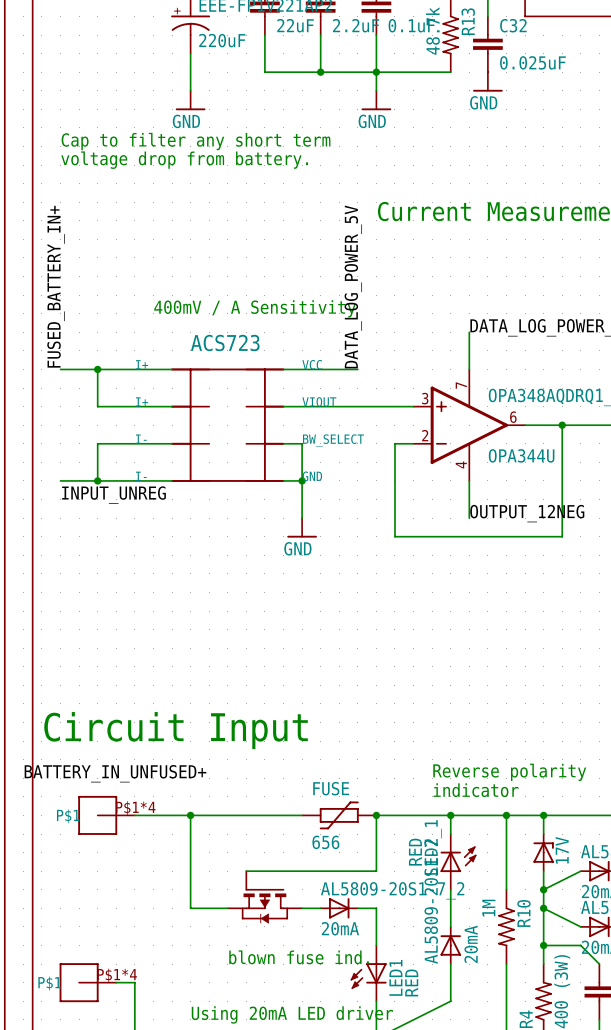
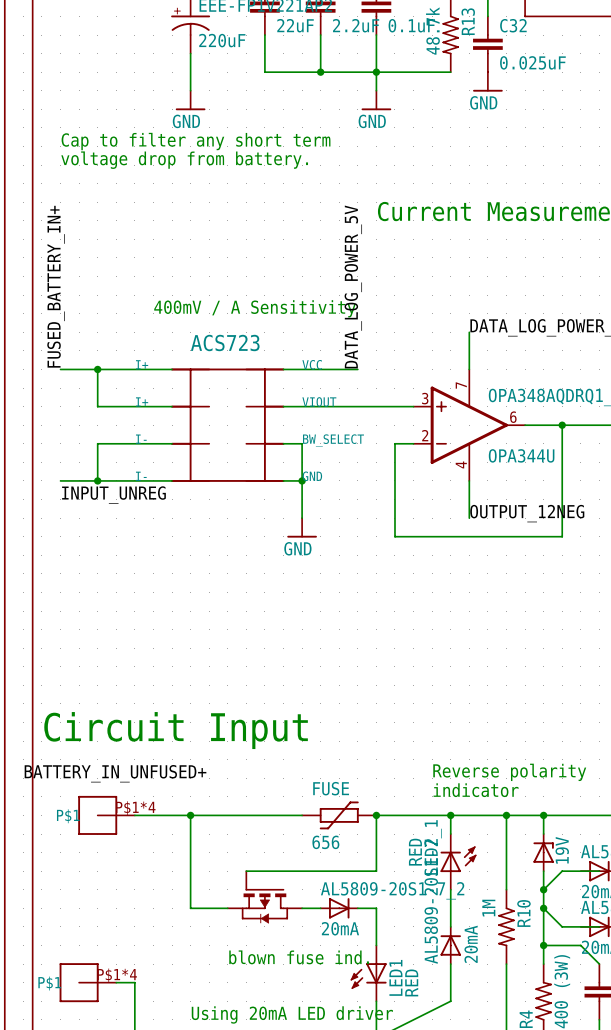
part value: 17V (562, 850) -> 19V (562, 850)
wire: (580, 871) (543, 889) -> (599, 871) (562, 871) (543, 889)
wire: (543, 908) (580, 926) -> (543, 908) (562, 926) (599, 926)

